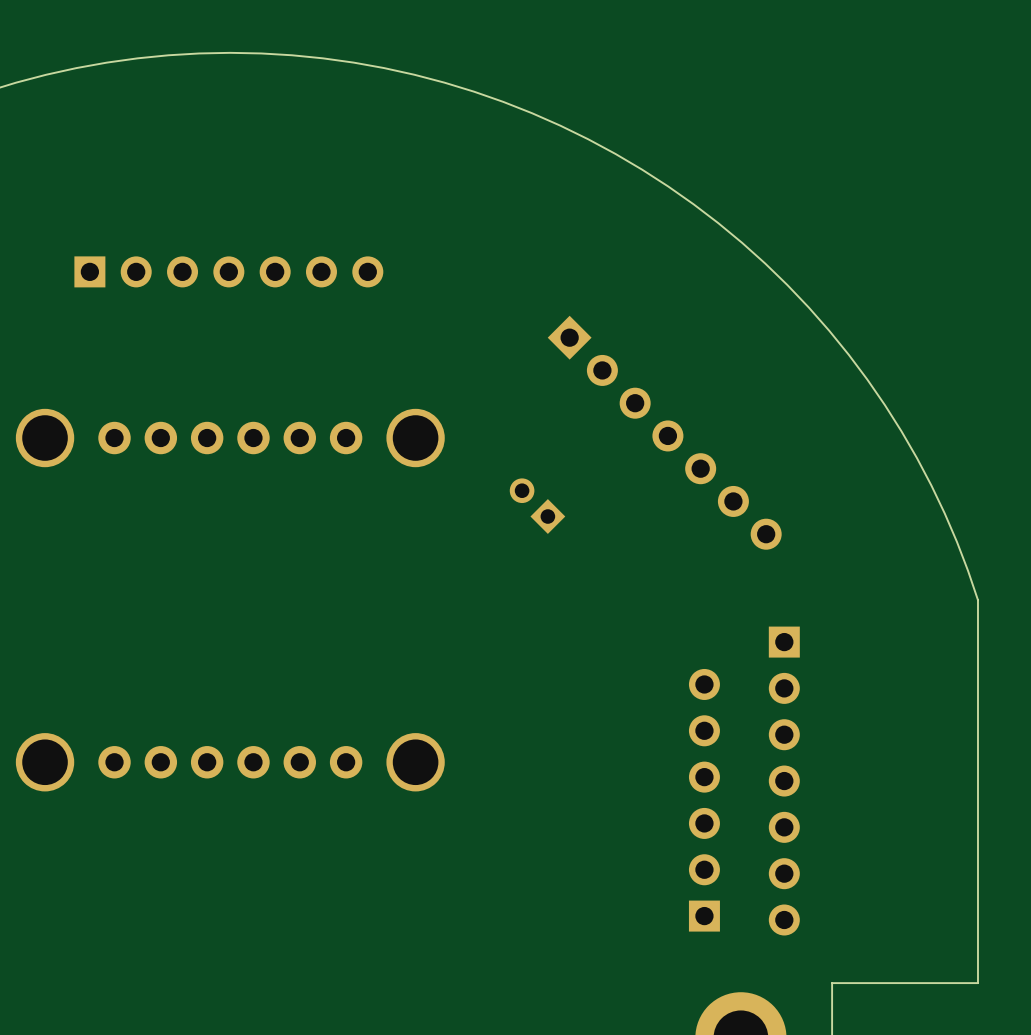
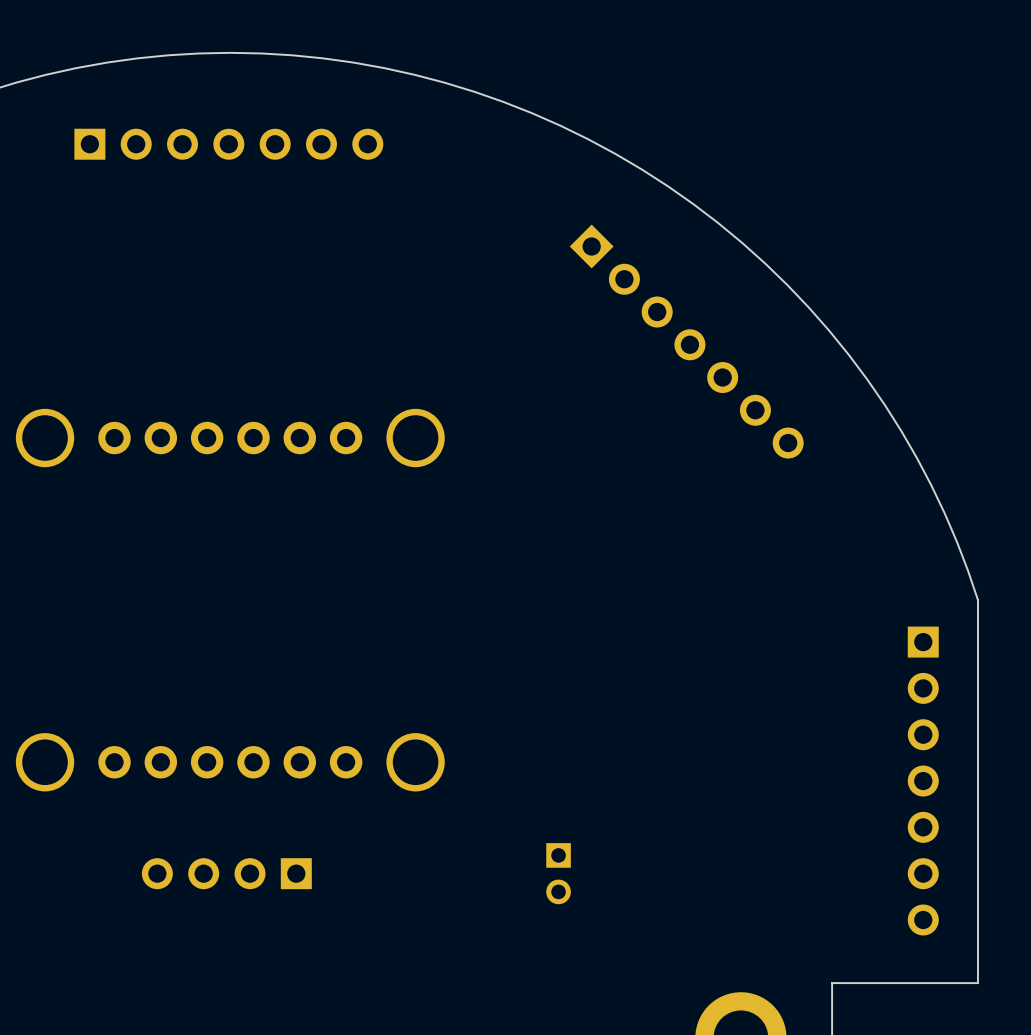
part position: (228, 271) -> (228, 144)
part position: (664, 432) -> (686, 341)
part: (537, 506) -> none
part position: (784, 781) -> (923, 781)
part: (704, 800) -> none
part: none -> (226, 873)
part: none -> (558, 873)

